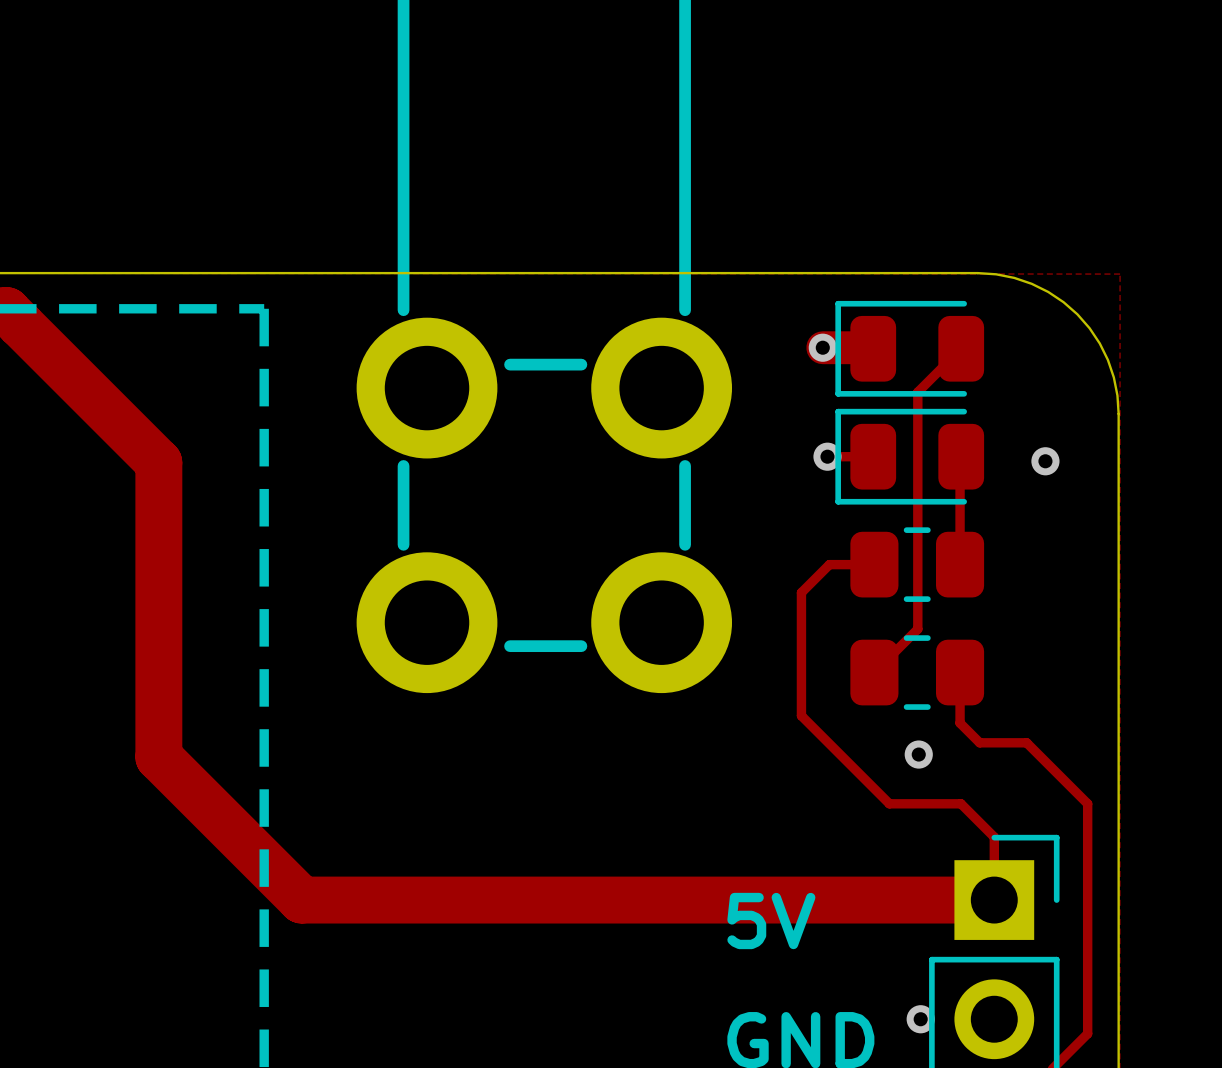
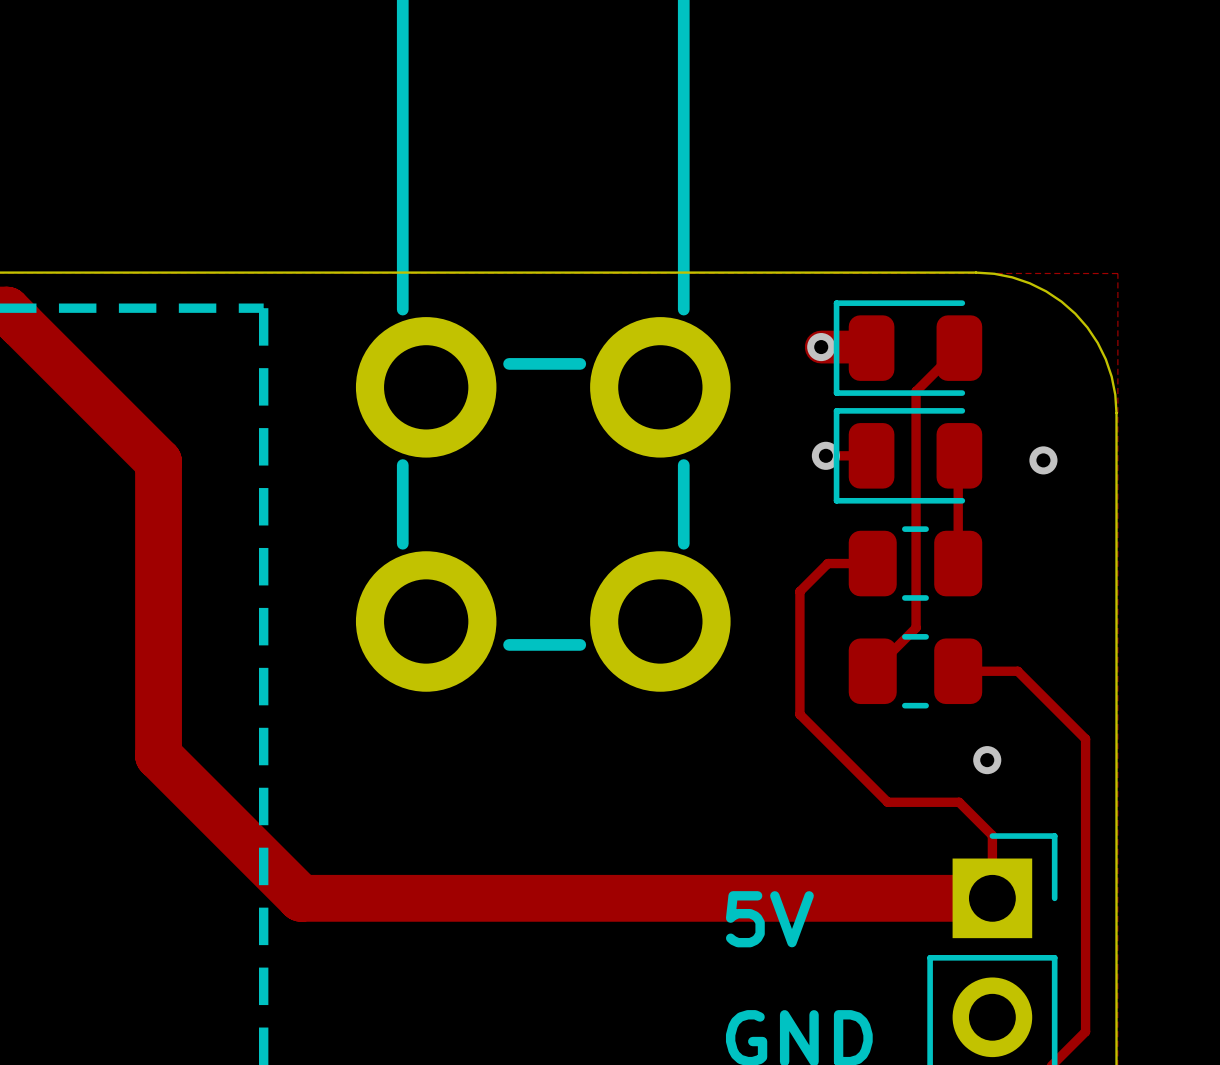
track: (960, 699) (960, 723) (979, 742) (1026, 742) (1087, 803) -> (958, 671) (1017, 671) (1085, 739) (1085, 802)
via position: (918, 754) -> (987, 760)
via: (920, 1019) -> none

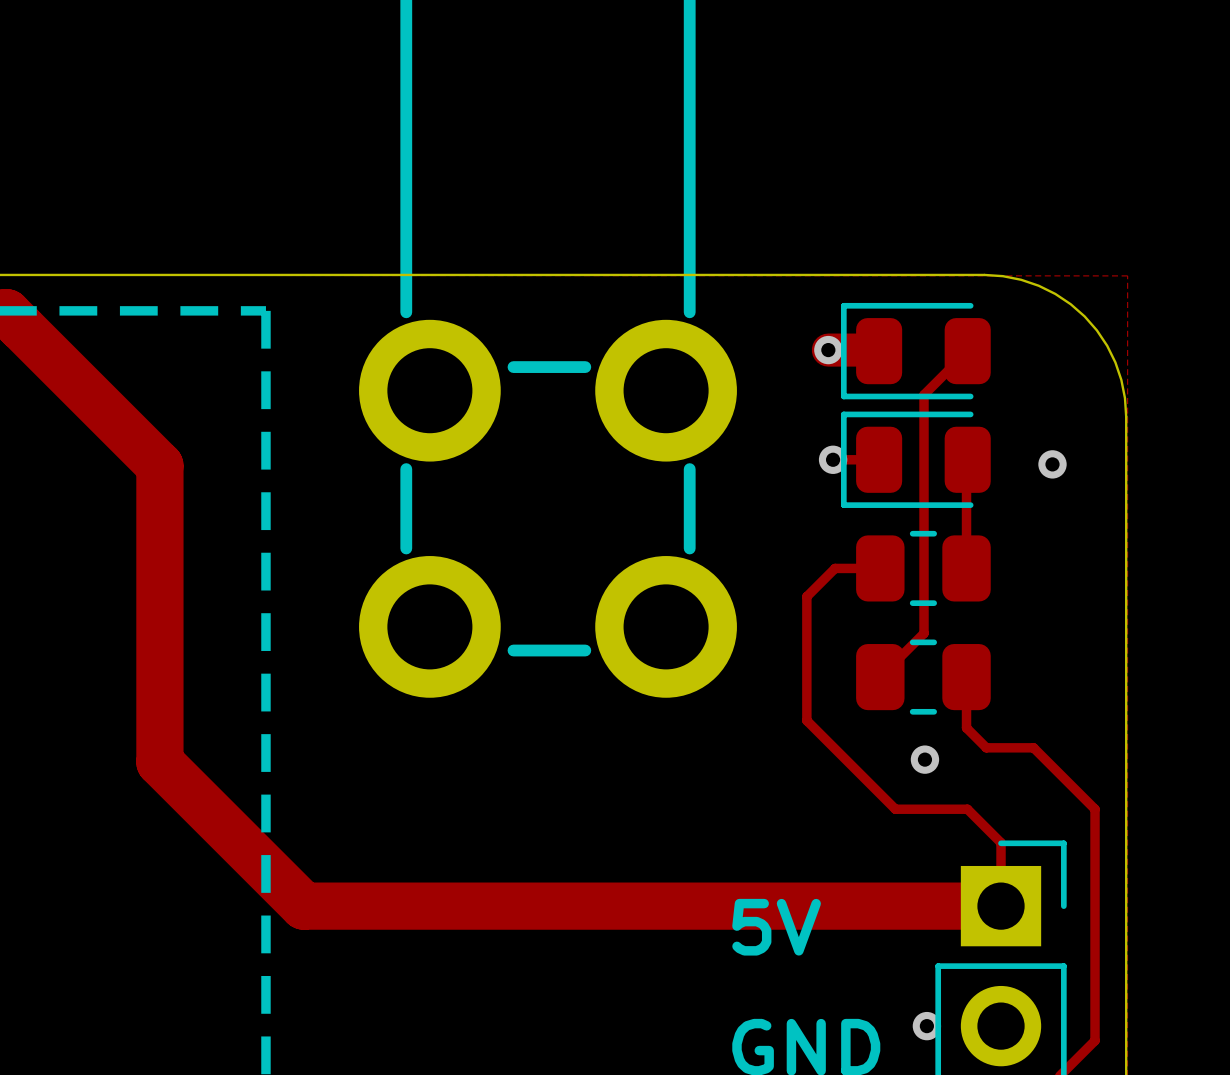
track: (958, 671) (1017, 671) (1085, 739) (1085, 802) -> (966, 704) (966, 727) (986, 747) (1033, 747) (1095, 809)
via position: (987, 760) -> (924, 759)
via: none -> (926, 1026)

